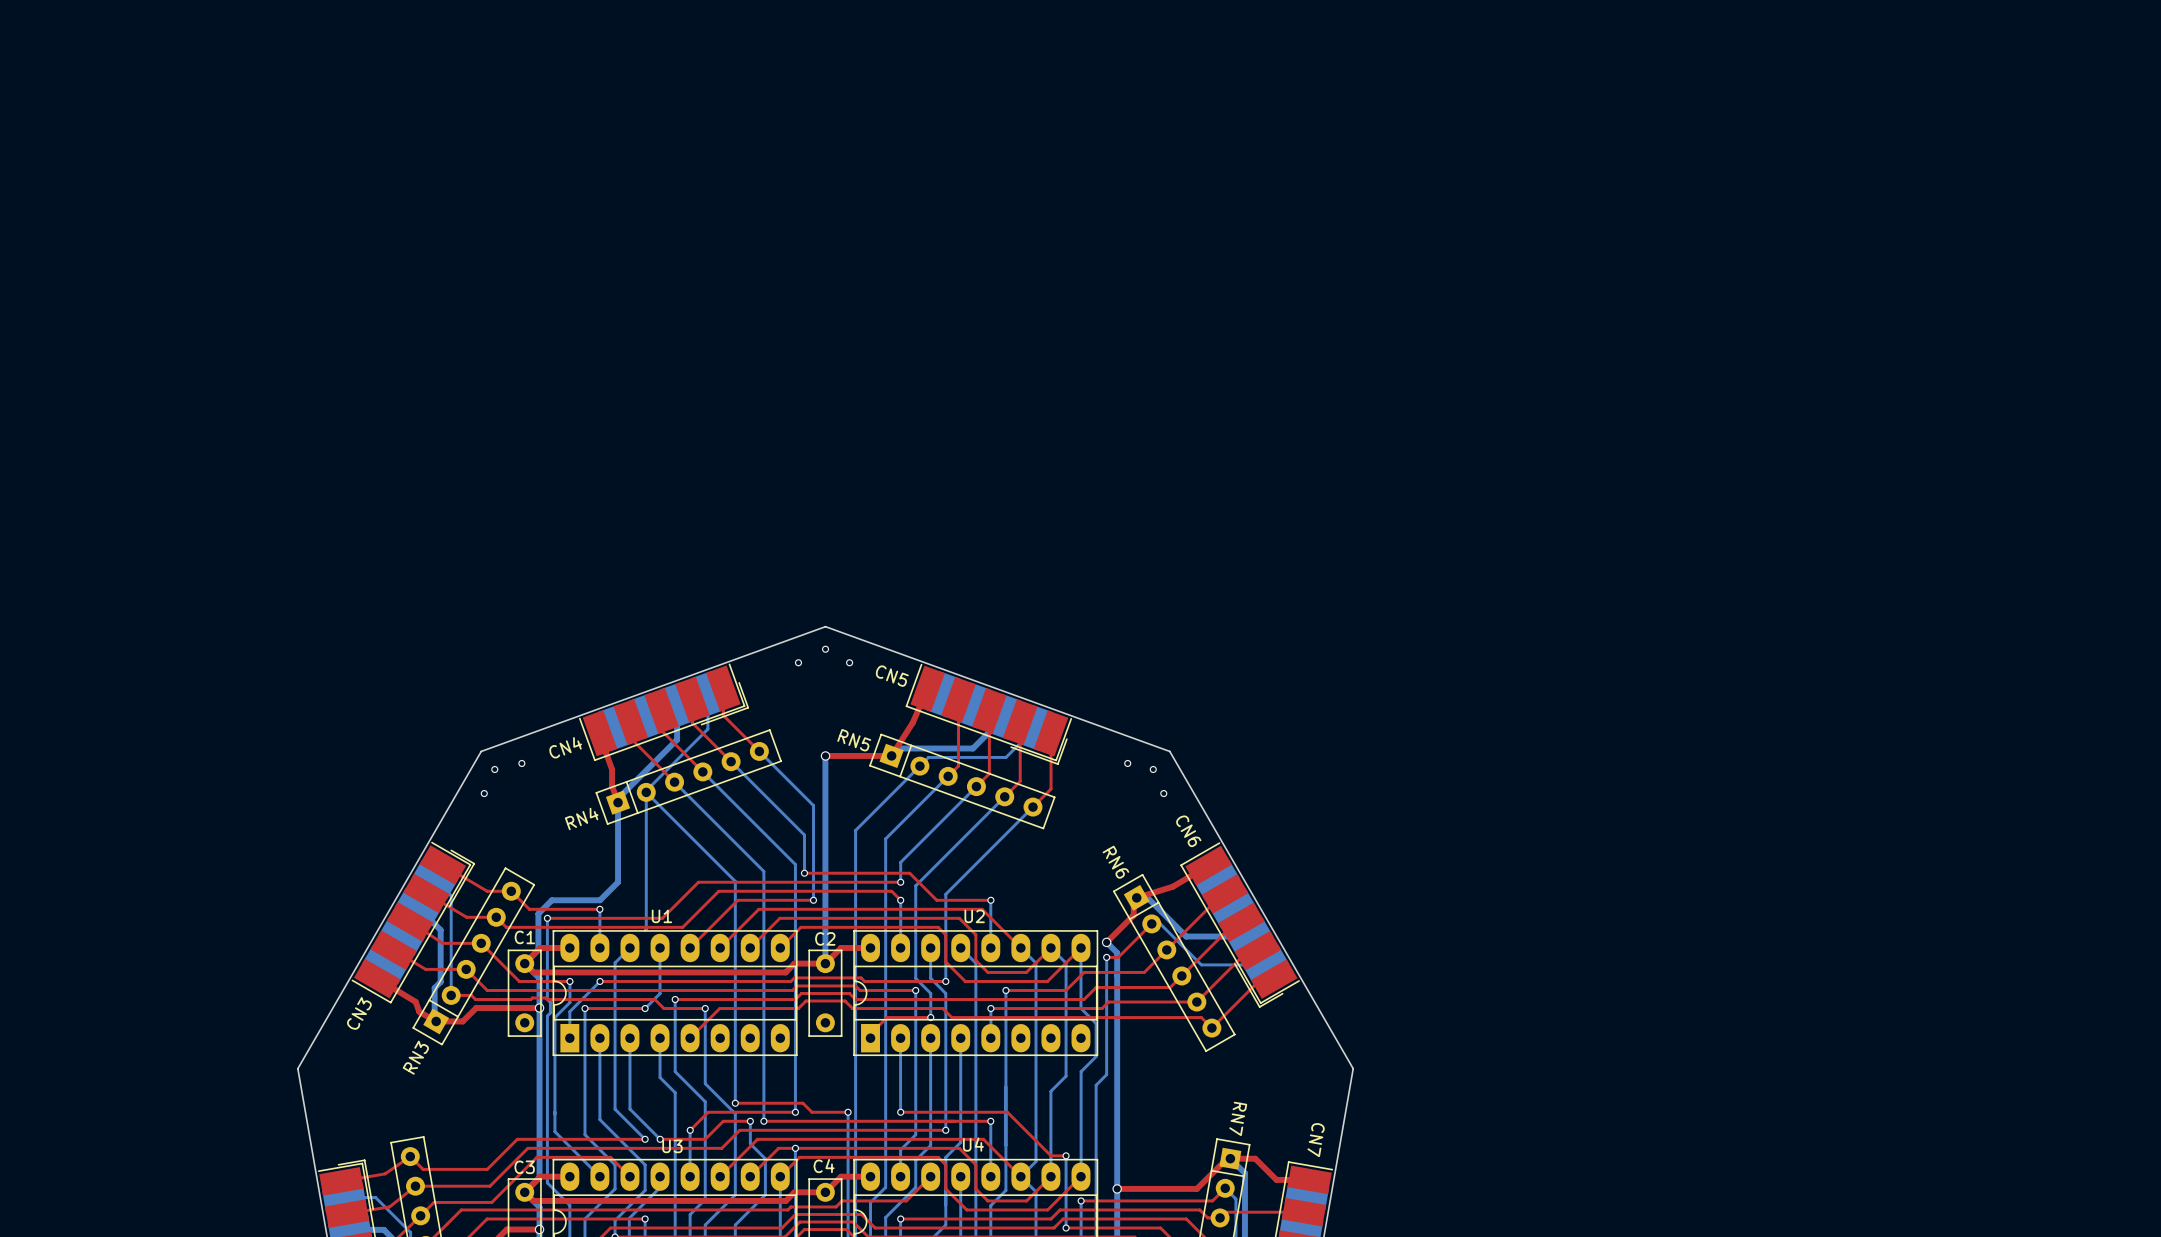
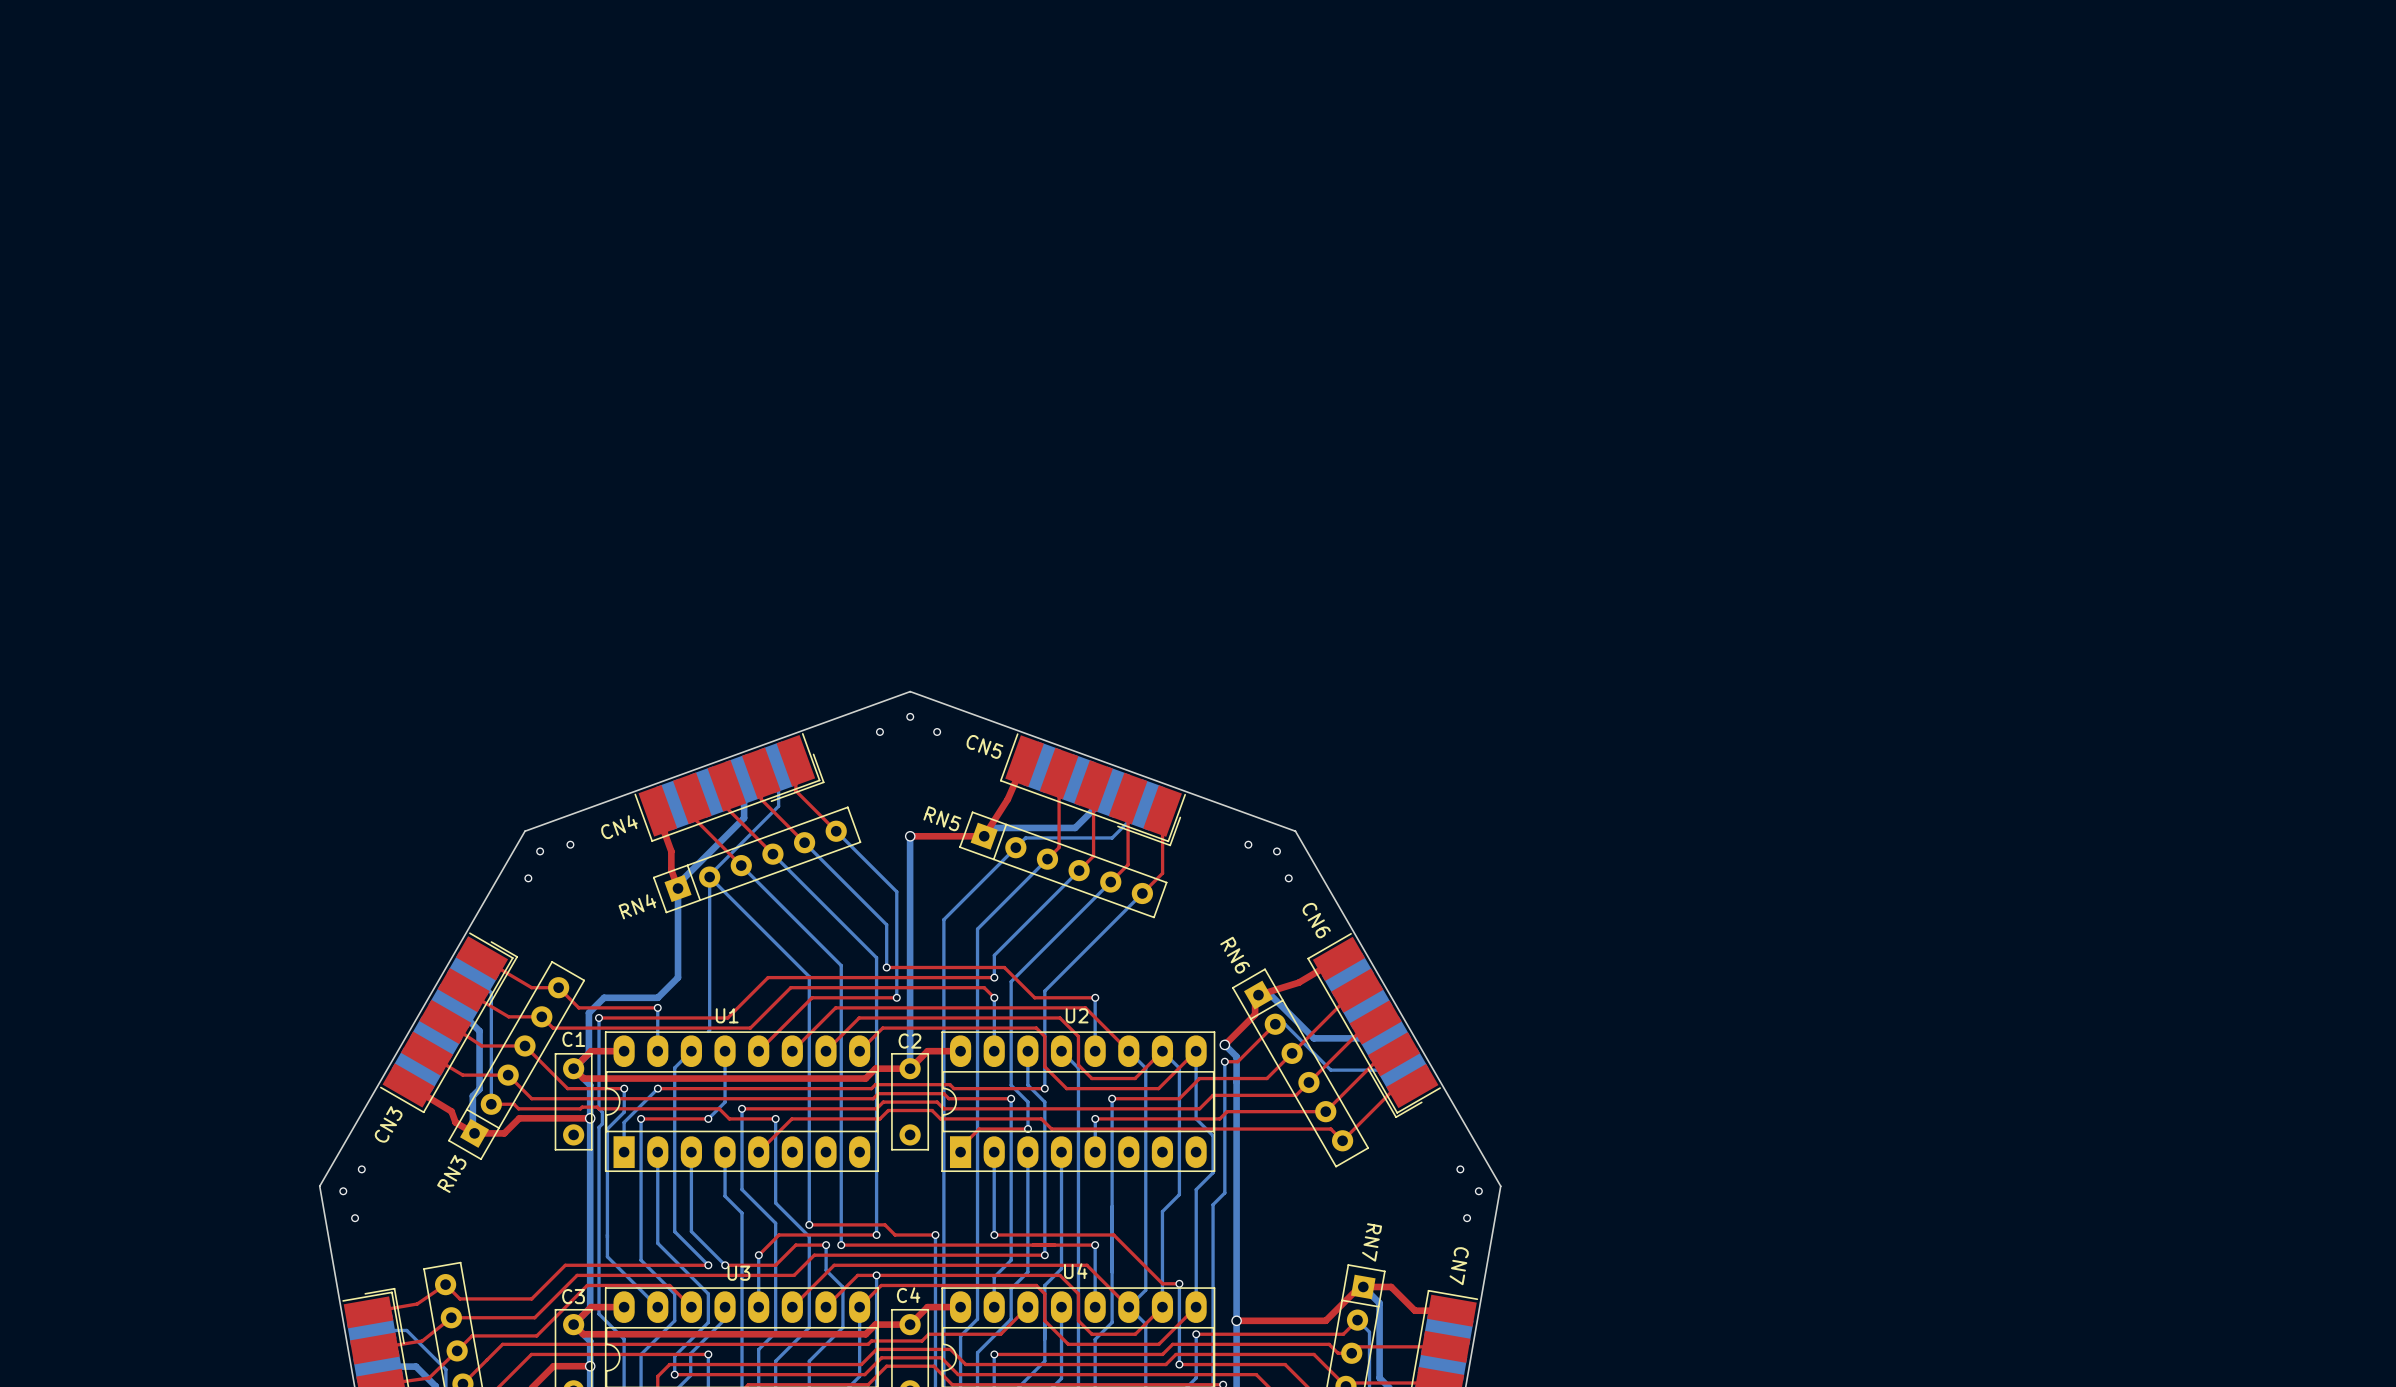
via: none -> (361, 1169)
via: none -> (1460, 1169)
via: none -> (343, 1191)
via: none -> (1478, 1191)
via: none -> (355, 1218)
via: none -> (1467, 1218)

